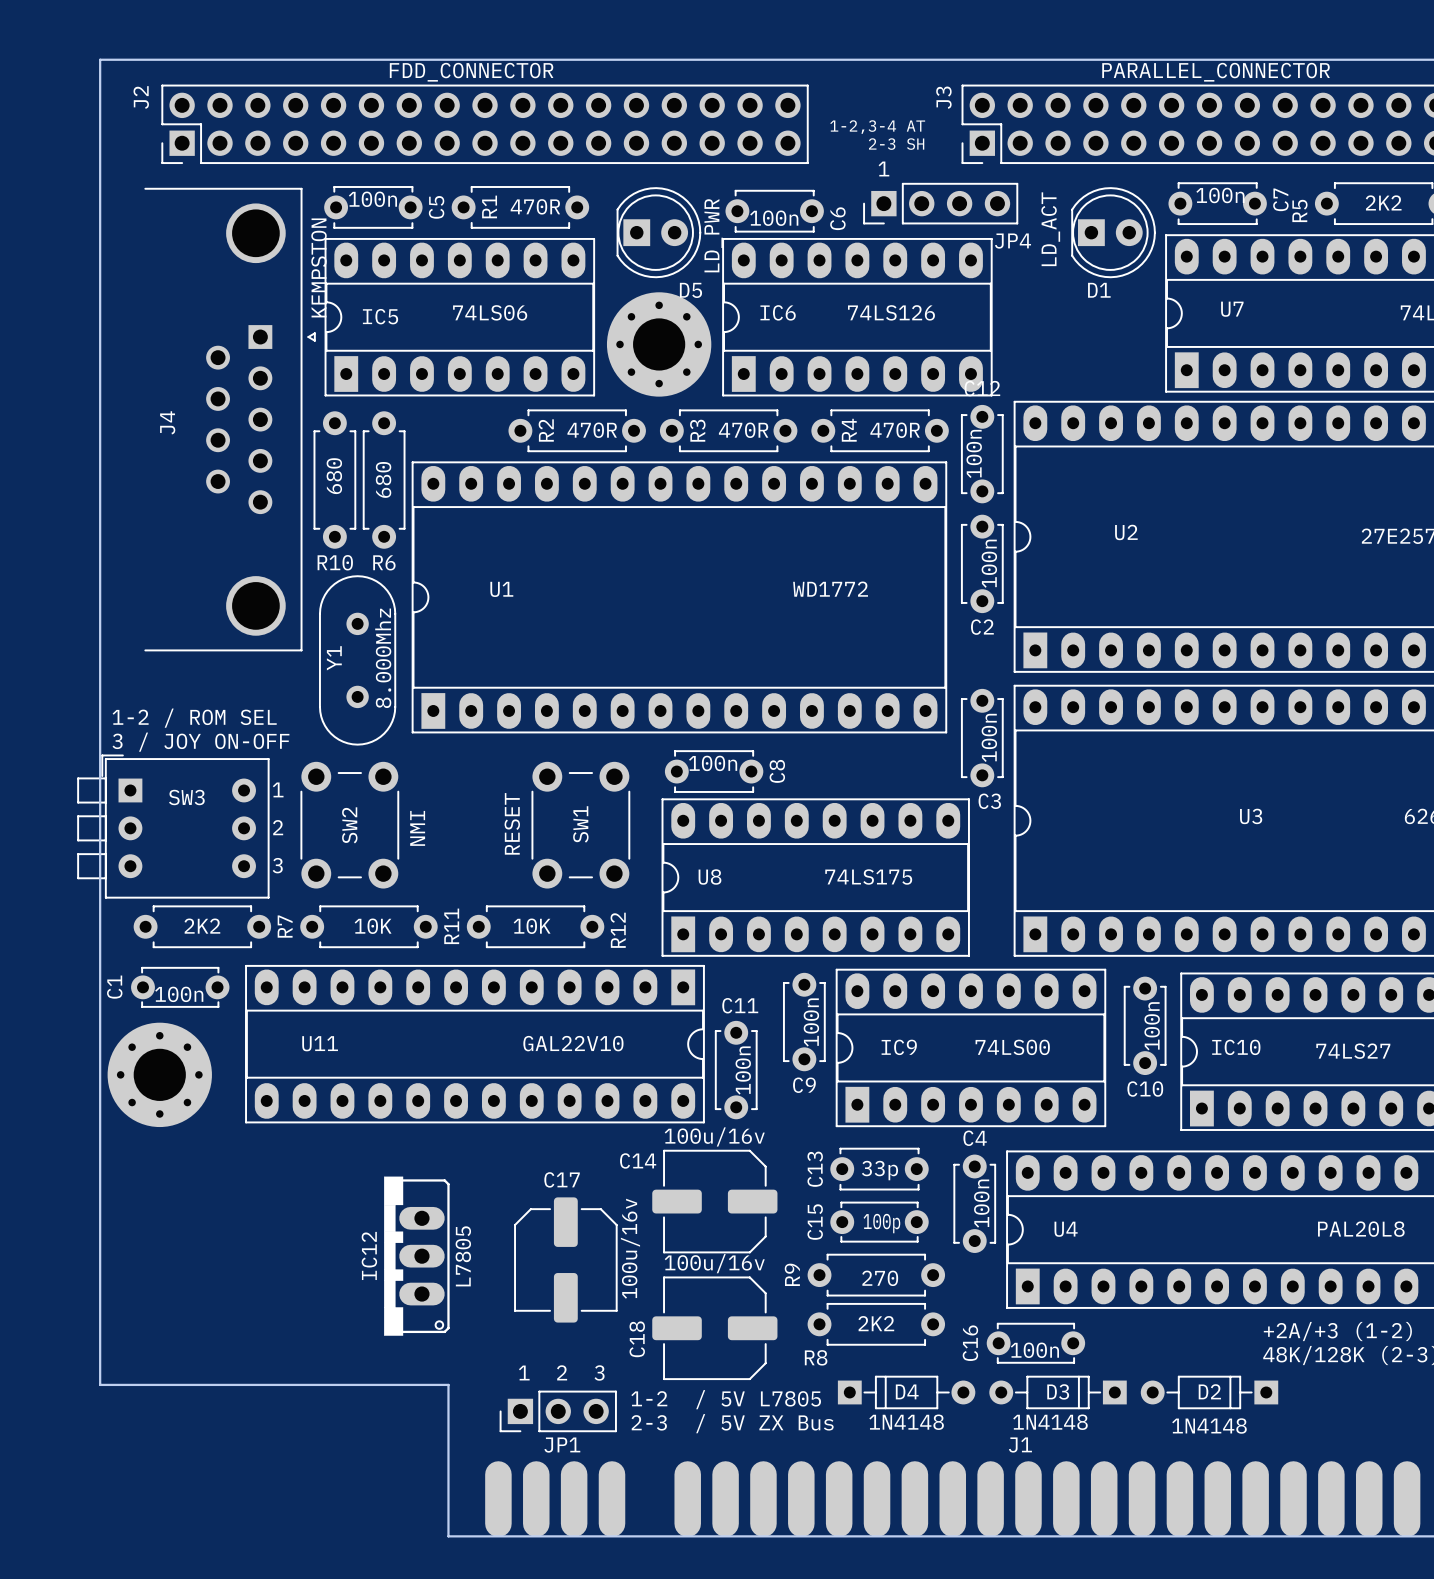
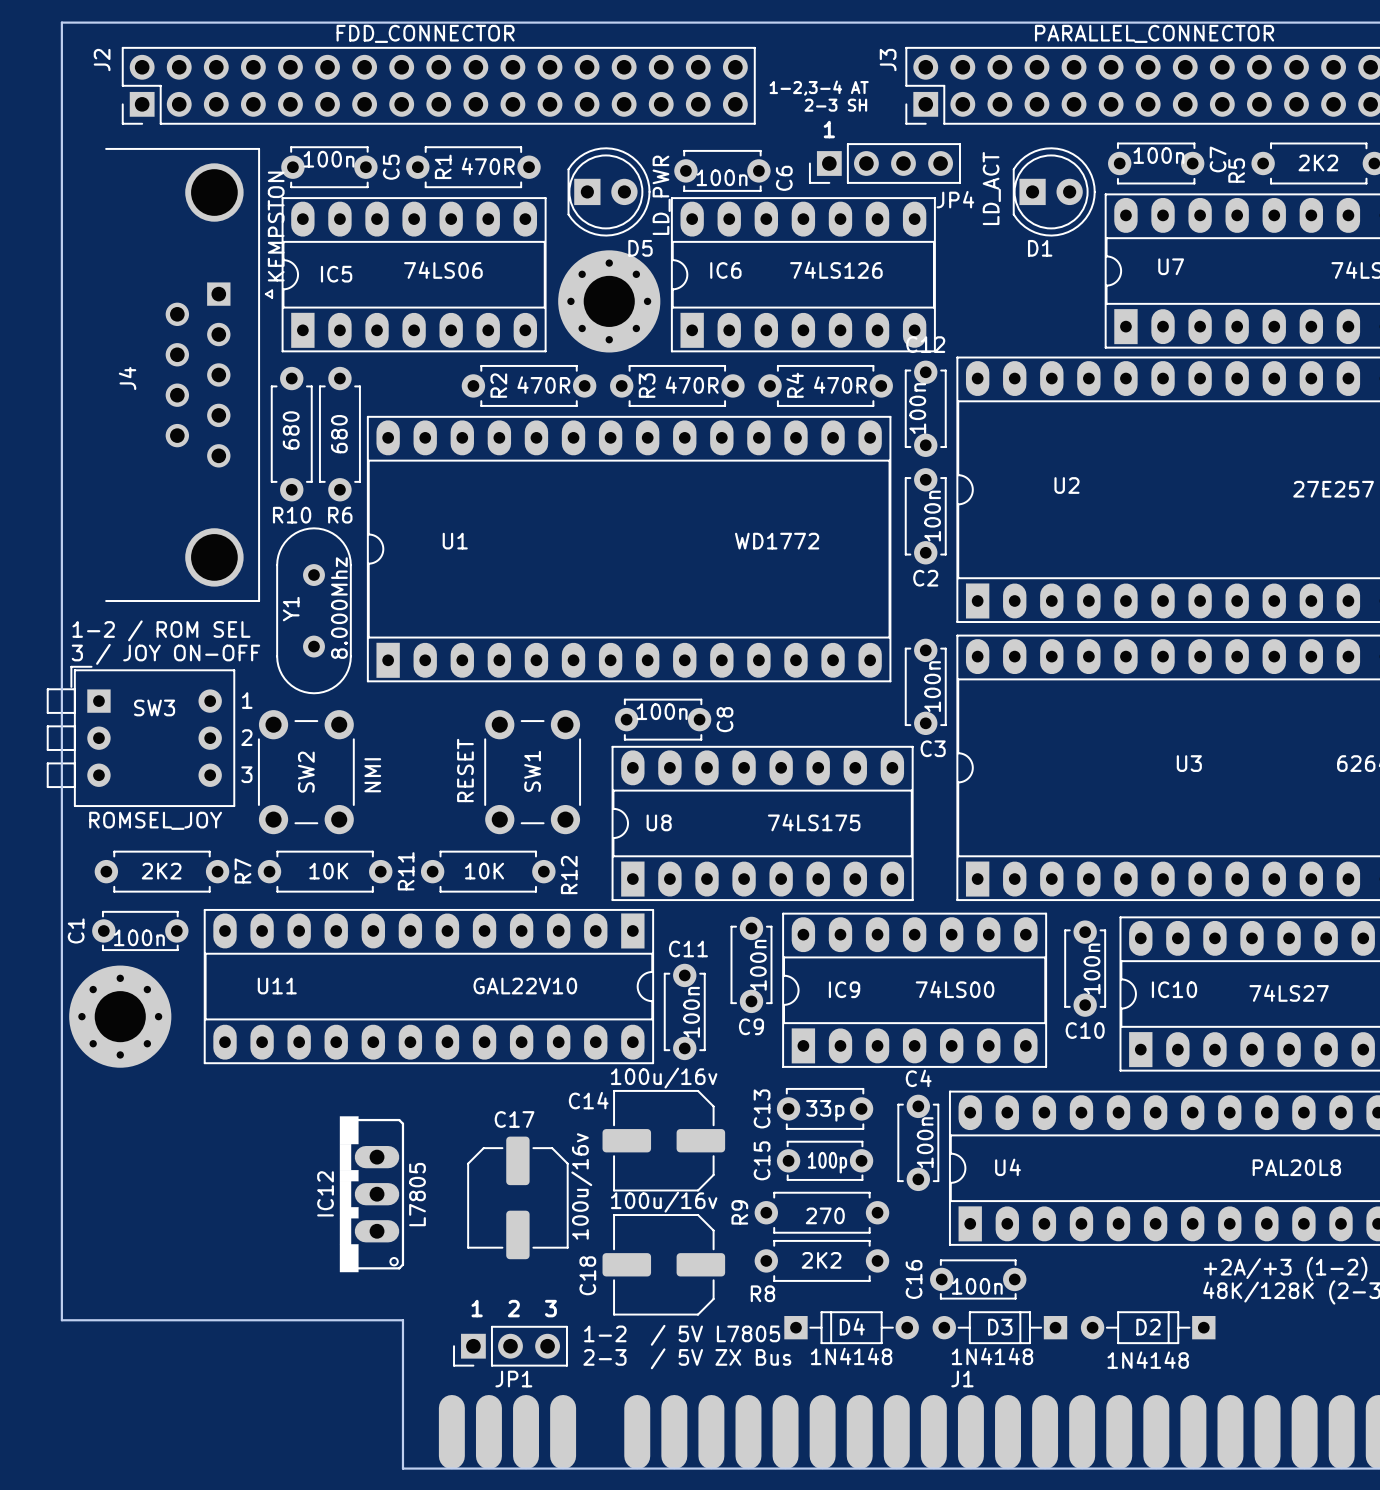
text: none -> 1-2 / ROM SEL (161, 630)
text: 1-2 / ROM SEL (194, 718) -> 3 / JOY ON-OFF (165, 654)
text: 3 / JOY ON-OFF (200, 742) -> none
text: none -> 1 (247, 700)
text: 1 (278, 789) -> 2 (246, 737)
SW3 position: (173, 826) -> (140, 736)
text: 2 (278, 827) -> 3 (246, 774)
text: 3 (277, 865) -> none
SW3 value: none -> ROMSEL_JOY (155, 820)

